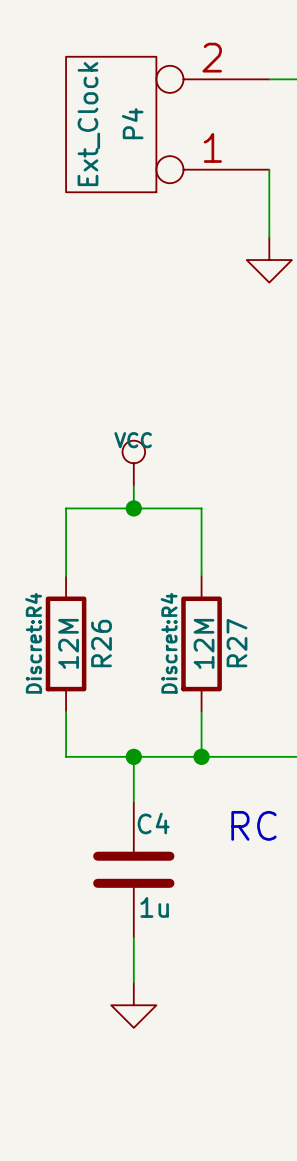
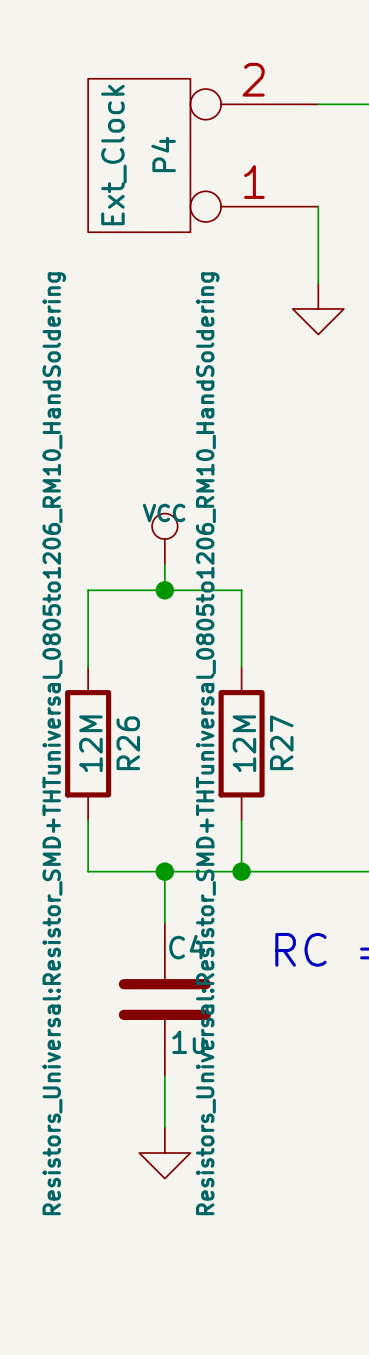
R26 text: Discret:R4 (33, 643) -> Resistors_Universal:Resistor_SMD+THTuniversal_0805to1206_RM10_HandSoldering (54, 743)
R27 text: Discret:R4 (169, 643) -> Resistors_Universal:Resistor_SMD+THTuniversal_0805to1206_RM10_HandSoldering (207, 743)

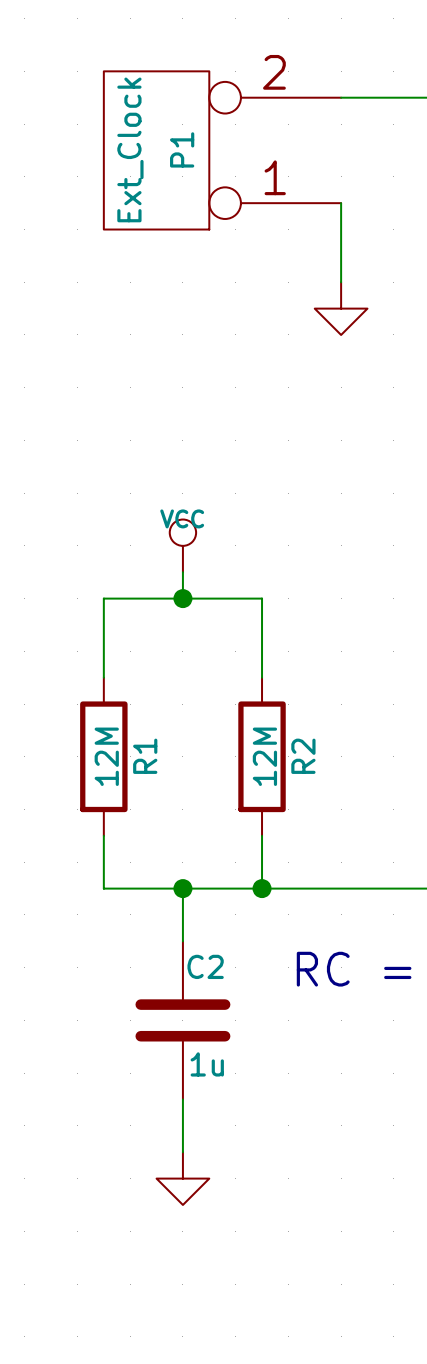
P4 name: P4 (163, 154) -> P1 (182, 149)
R27 name: R27 (281, 742) -> R2 (303, 756)
R26 text: Resistors_Universal:Resistor_SMD+THTuniversal_0805to1206_RM10_HandSoldering (54, 743) -> none
R26 name: R26 (128, 743) -> R1 (145, 756)
R27 text: Resistors_Universal:Resistor_SMD+THTuniversal_0805to1206_RM10_HandSoldering (207, 743) -> none
C4 name: C4 (187, 947) -> C2 (205, 966)

